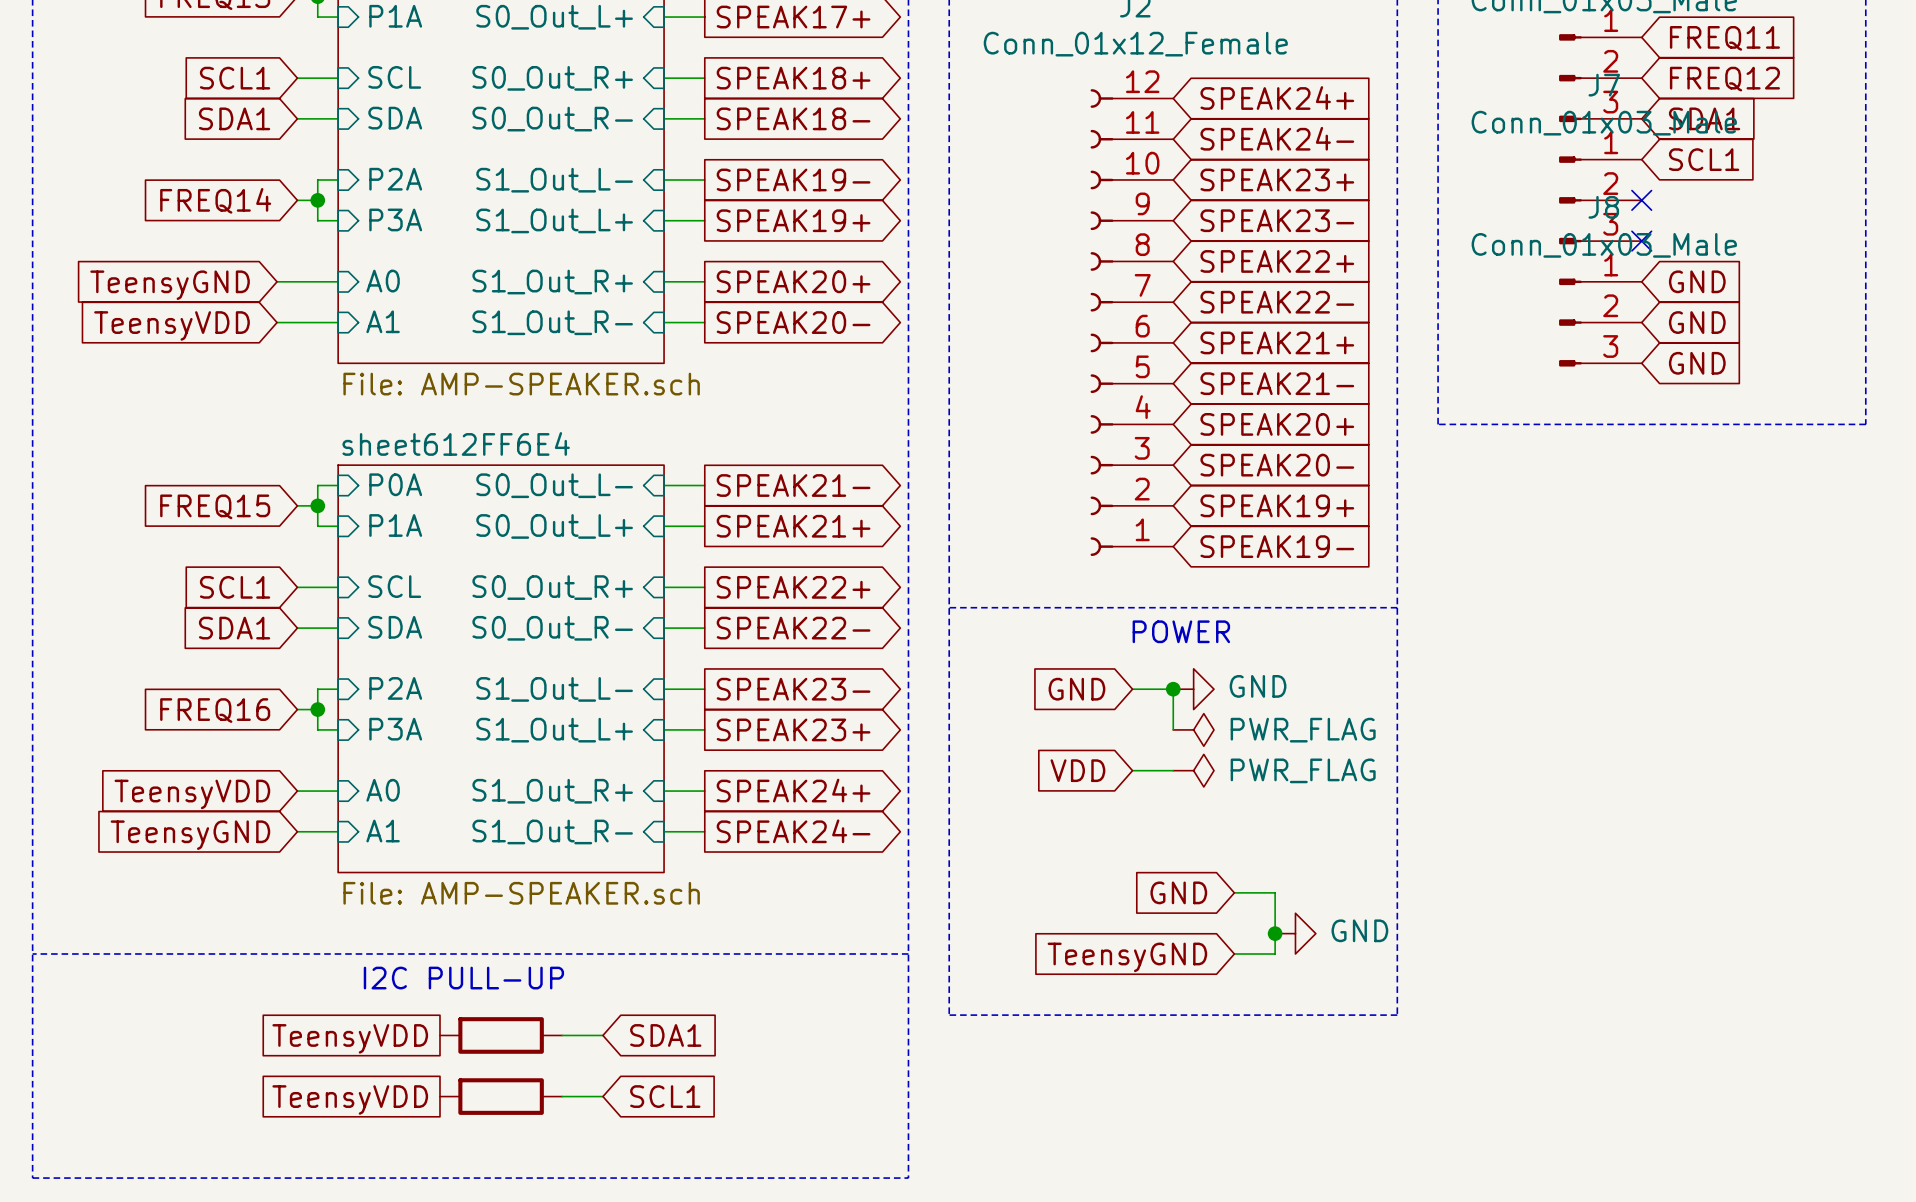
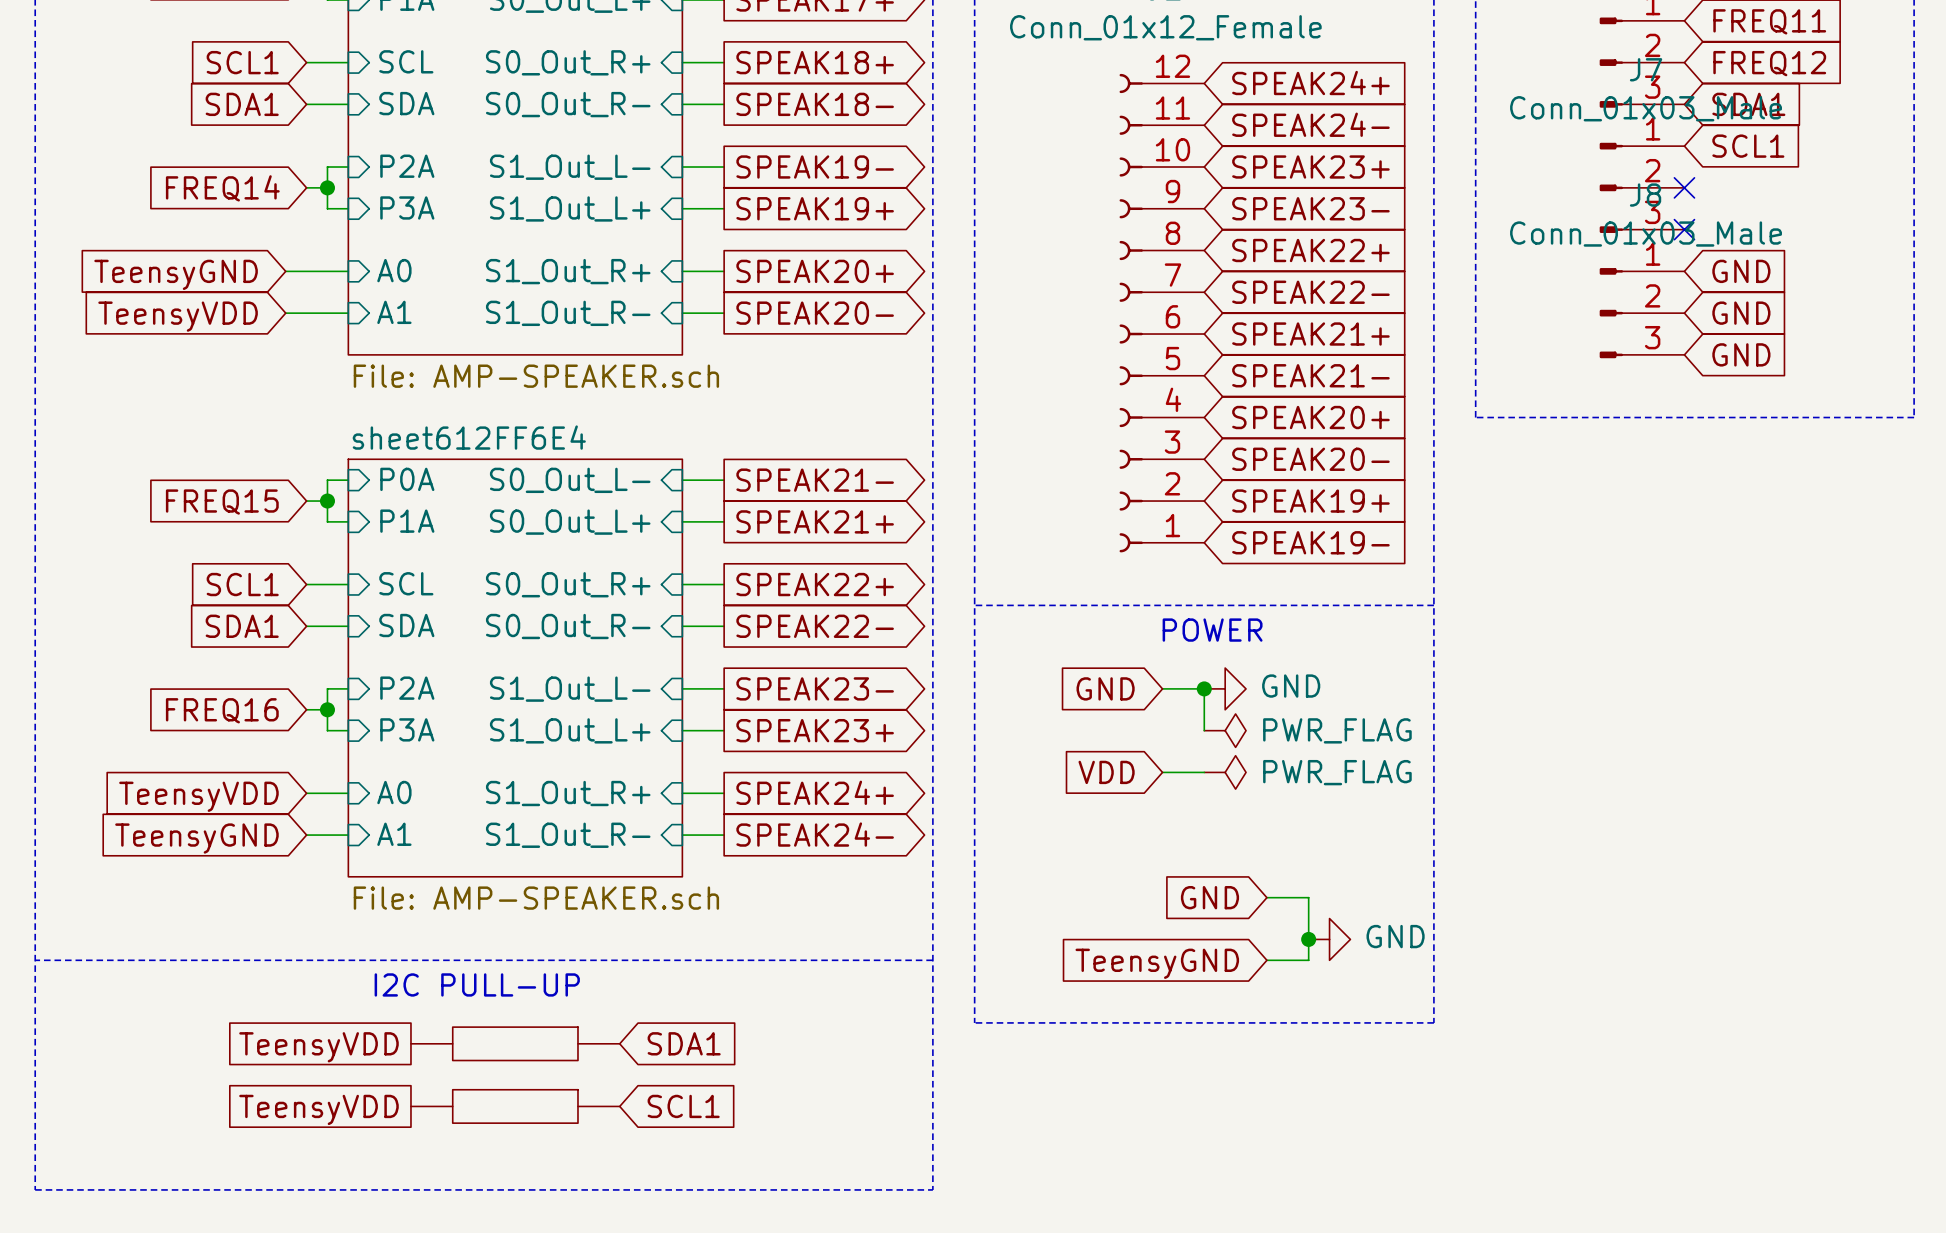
part symbol: [439, 1017, 563, 1054] -> [410, 1027, 620, 1061]
global label position: TeensyVDD (350, 1038) -> TeensyVDD (318, 1047)
part symbol: [439, 1078, 563, 1115] -> [410, 1089, 620, 1124]
global label position: TeensyVDD (350, 1099) -> TeensyVDD (318, 1109)

